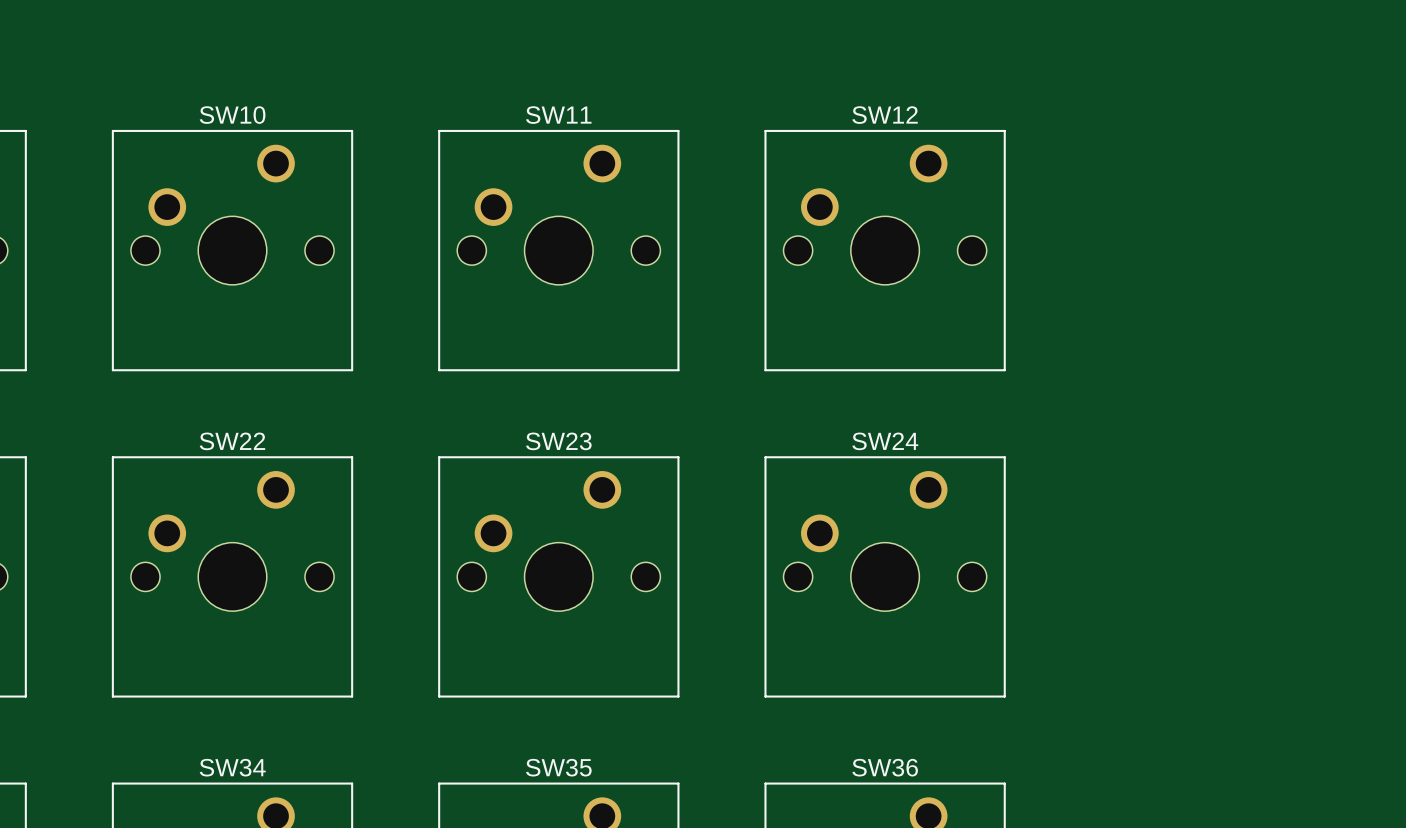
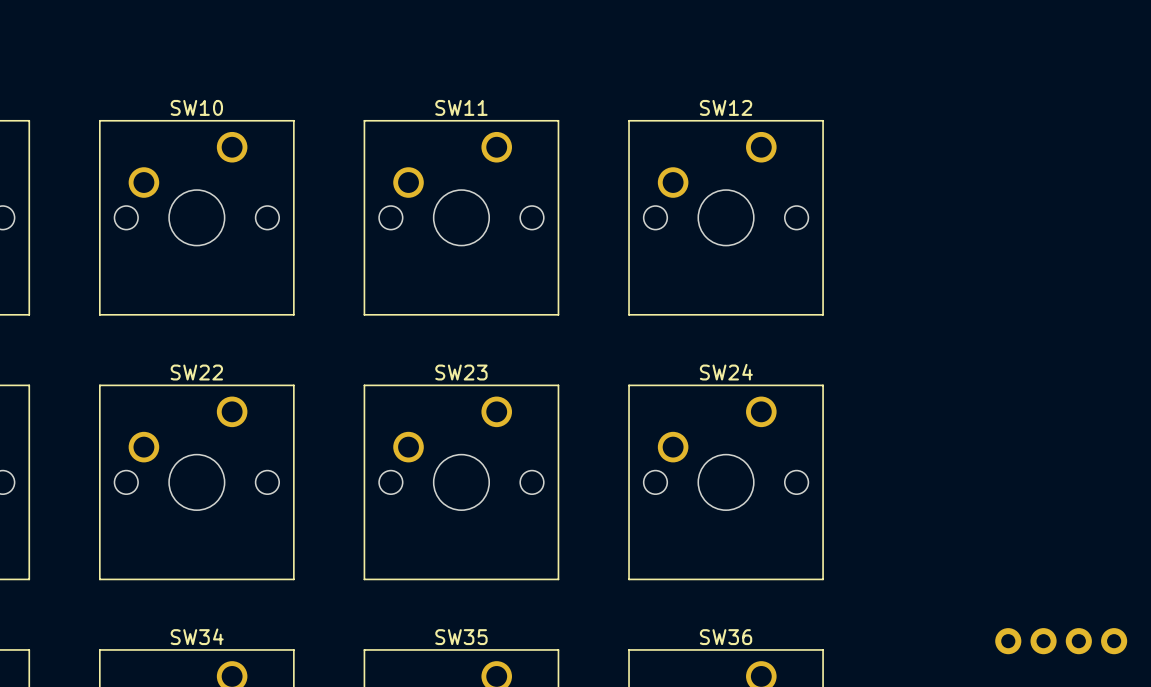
part: none -> (1061, 641)

